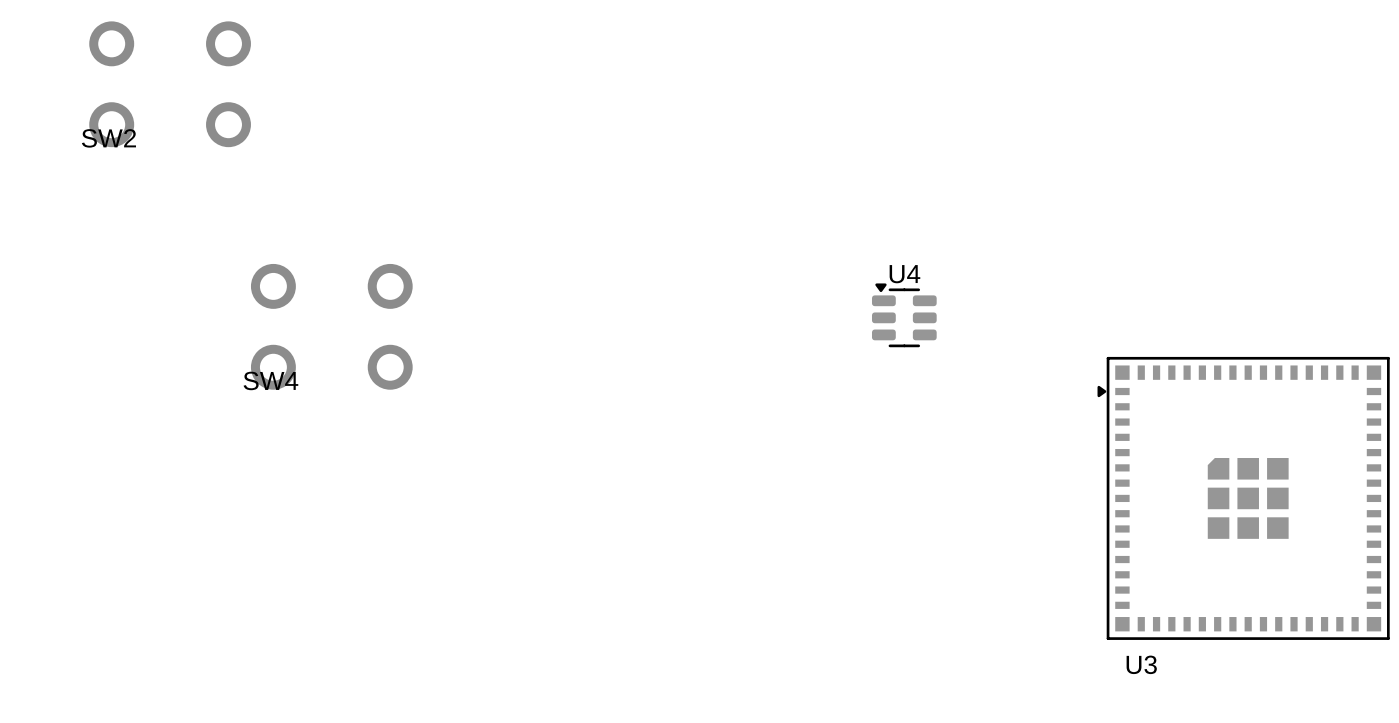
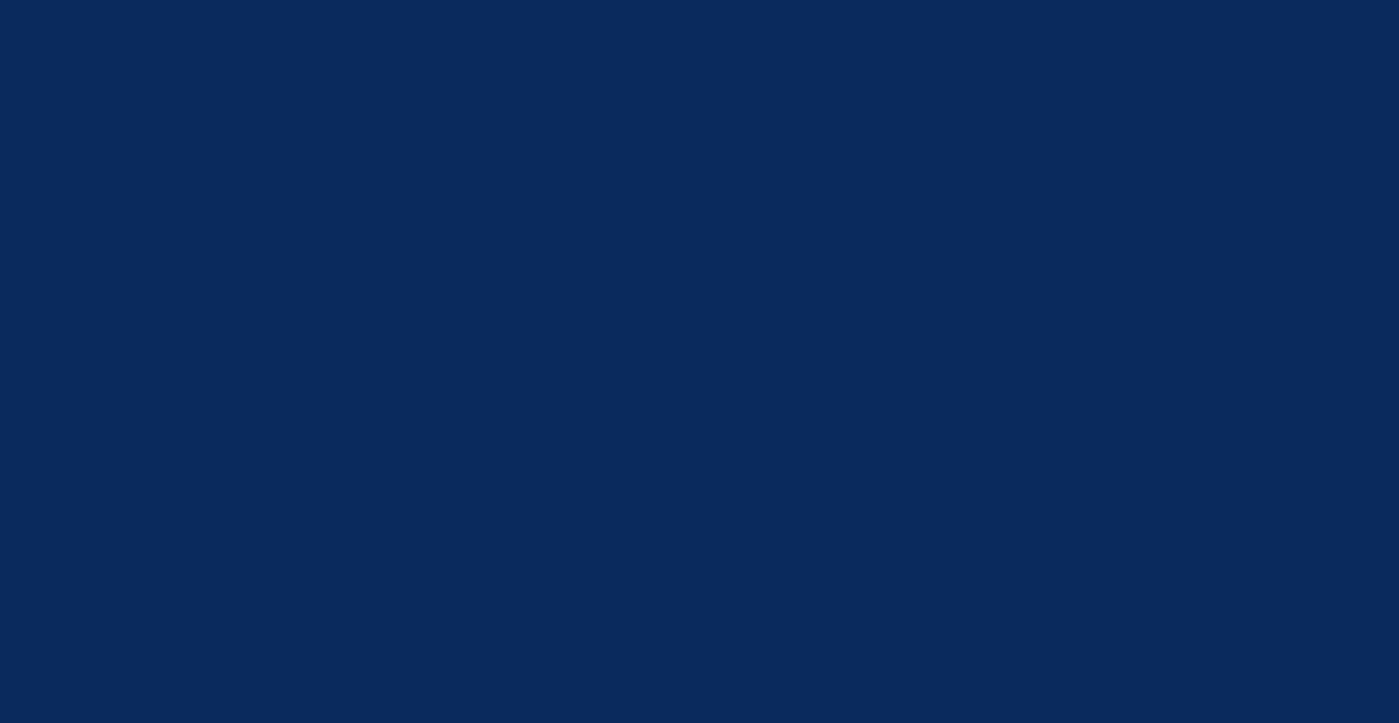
SW2: (170, 84) -> none
U4: (904, 315) -> none
SW4: (331, 326) -> none
U3: (1243, 498) -> none

